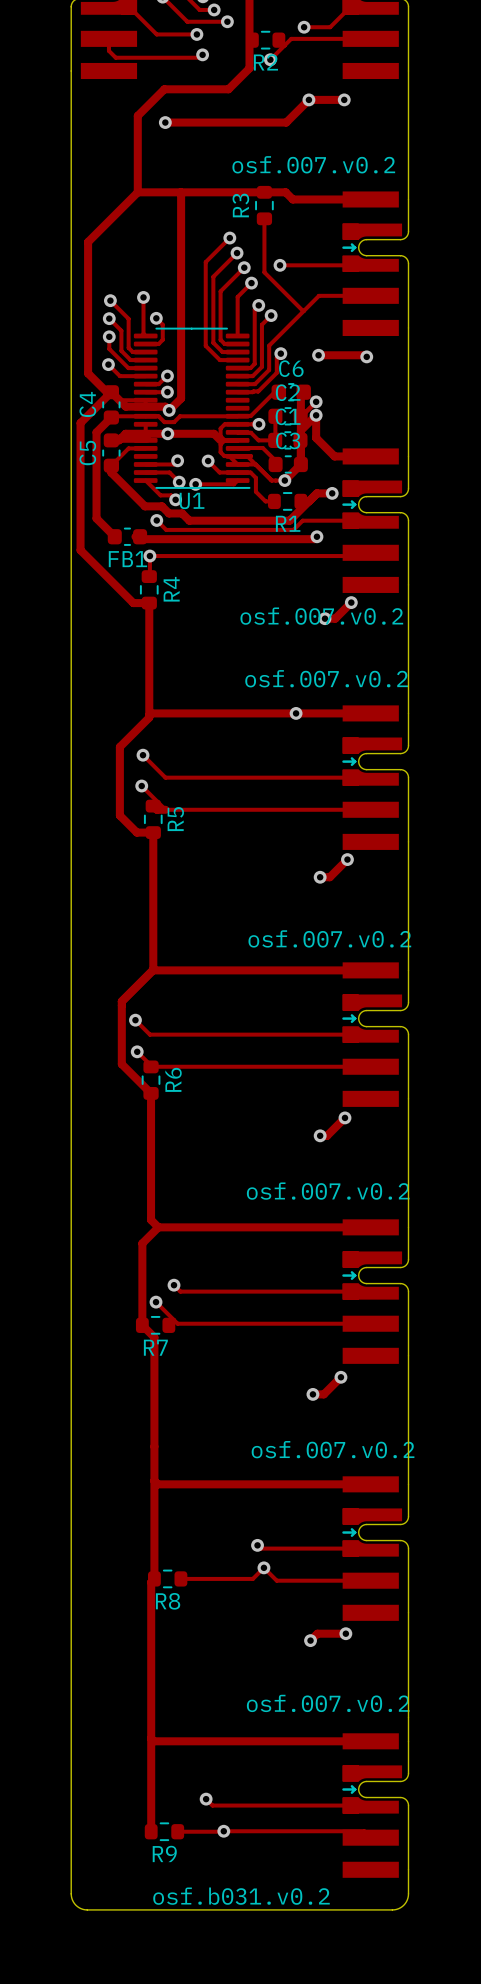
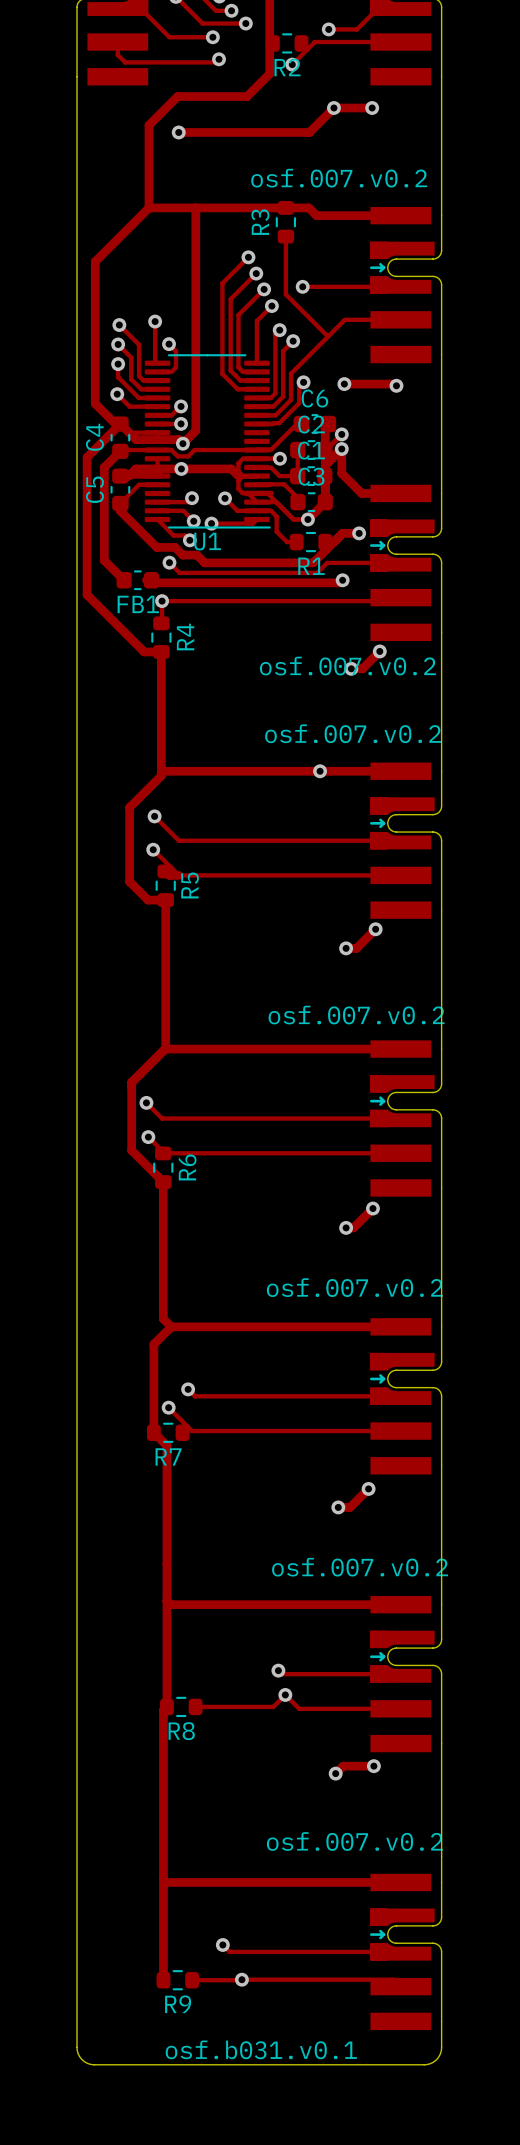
text: osf.b031.v0.2 (241, 1896) -> osf.b031.v0.1 (261, 2049)

